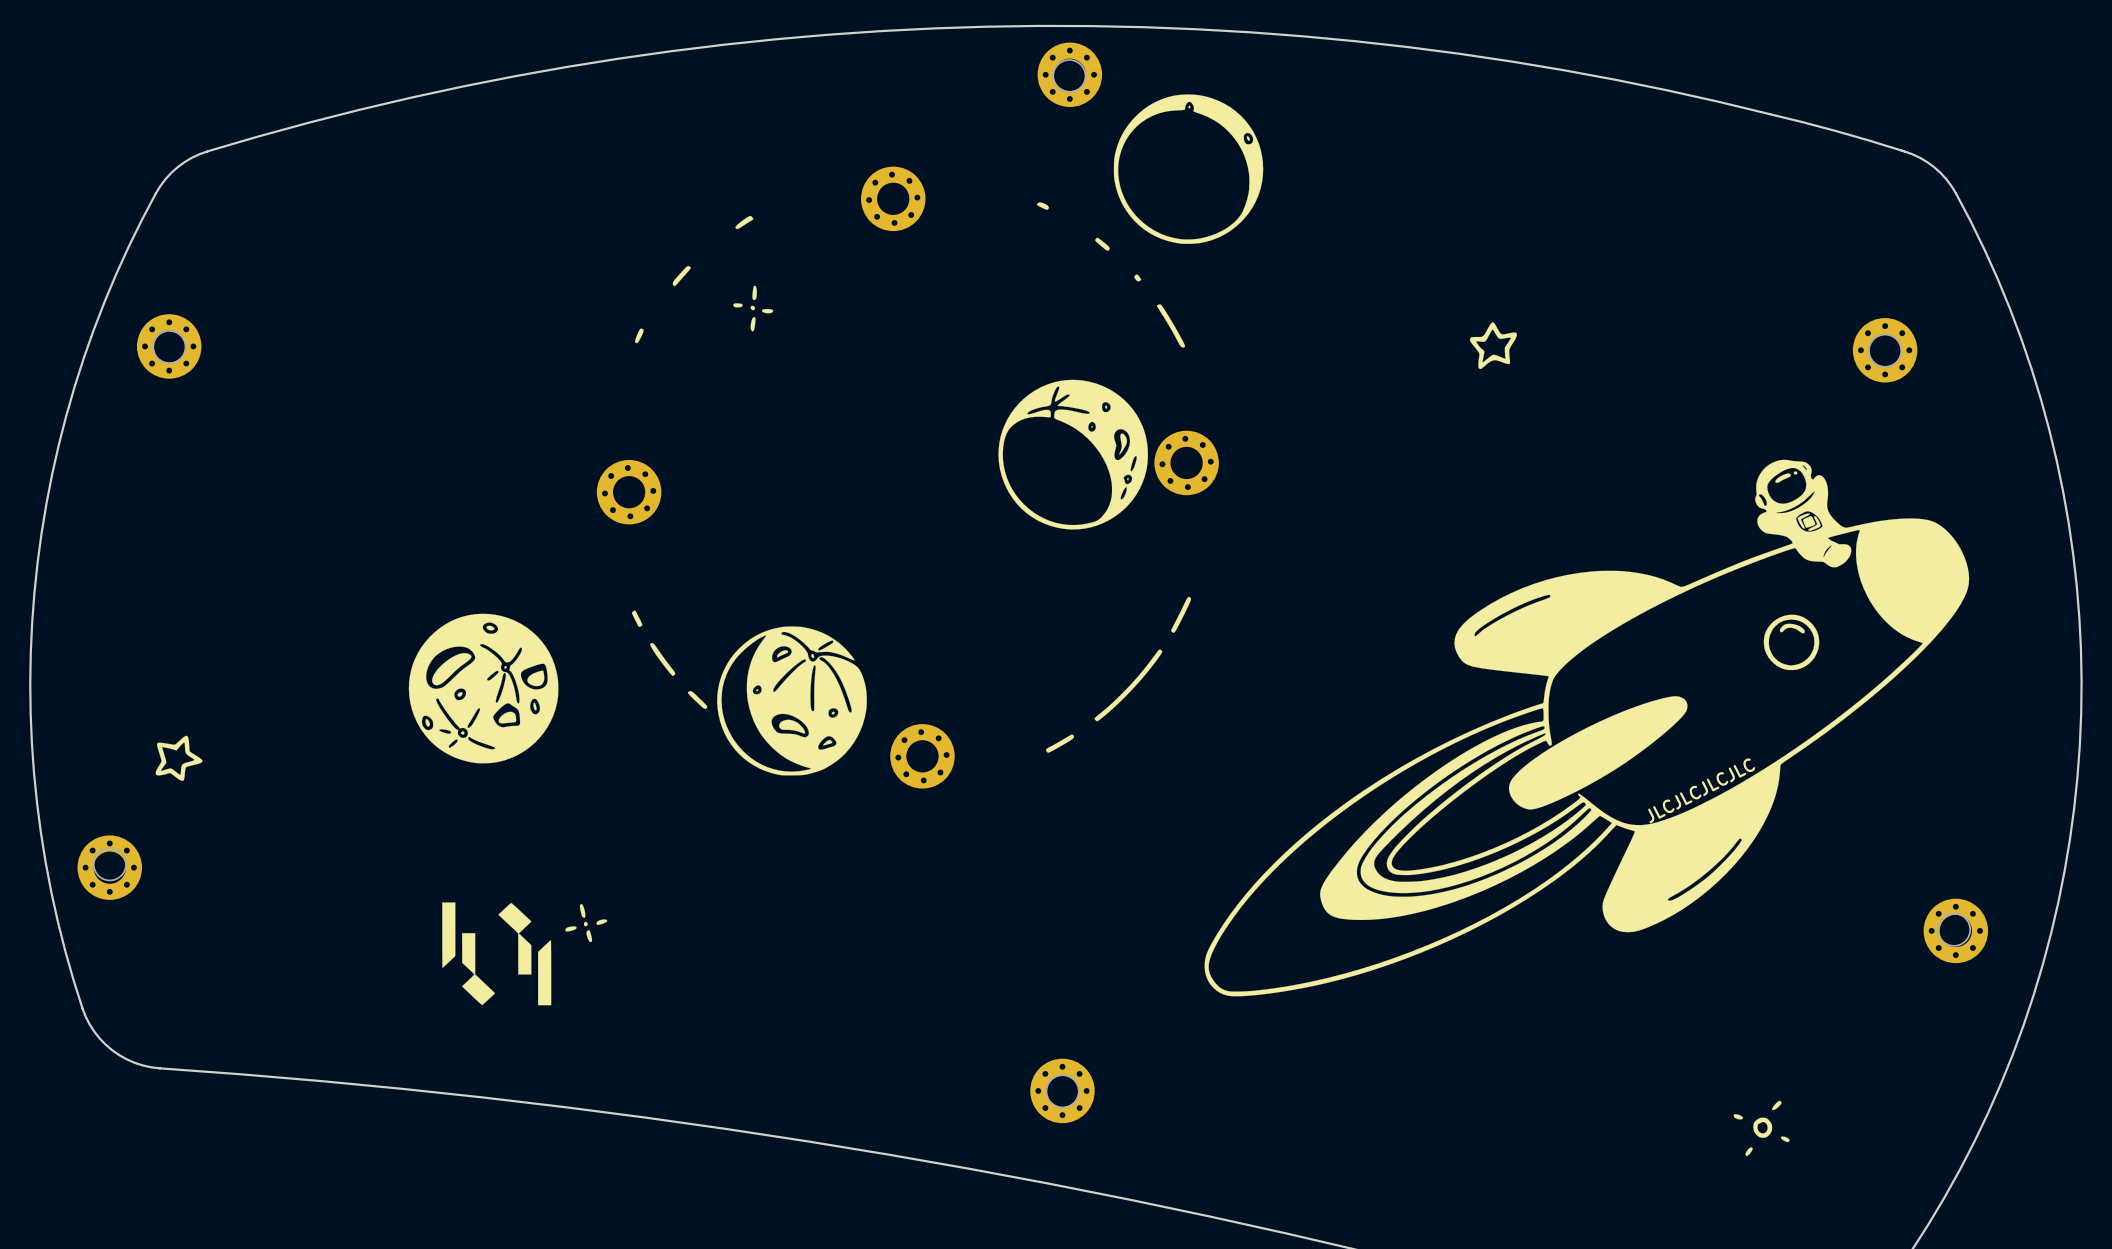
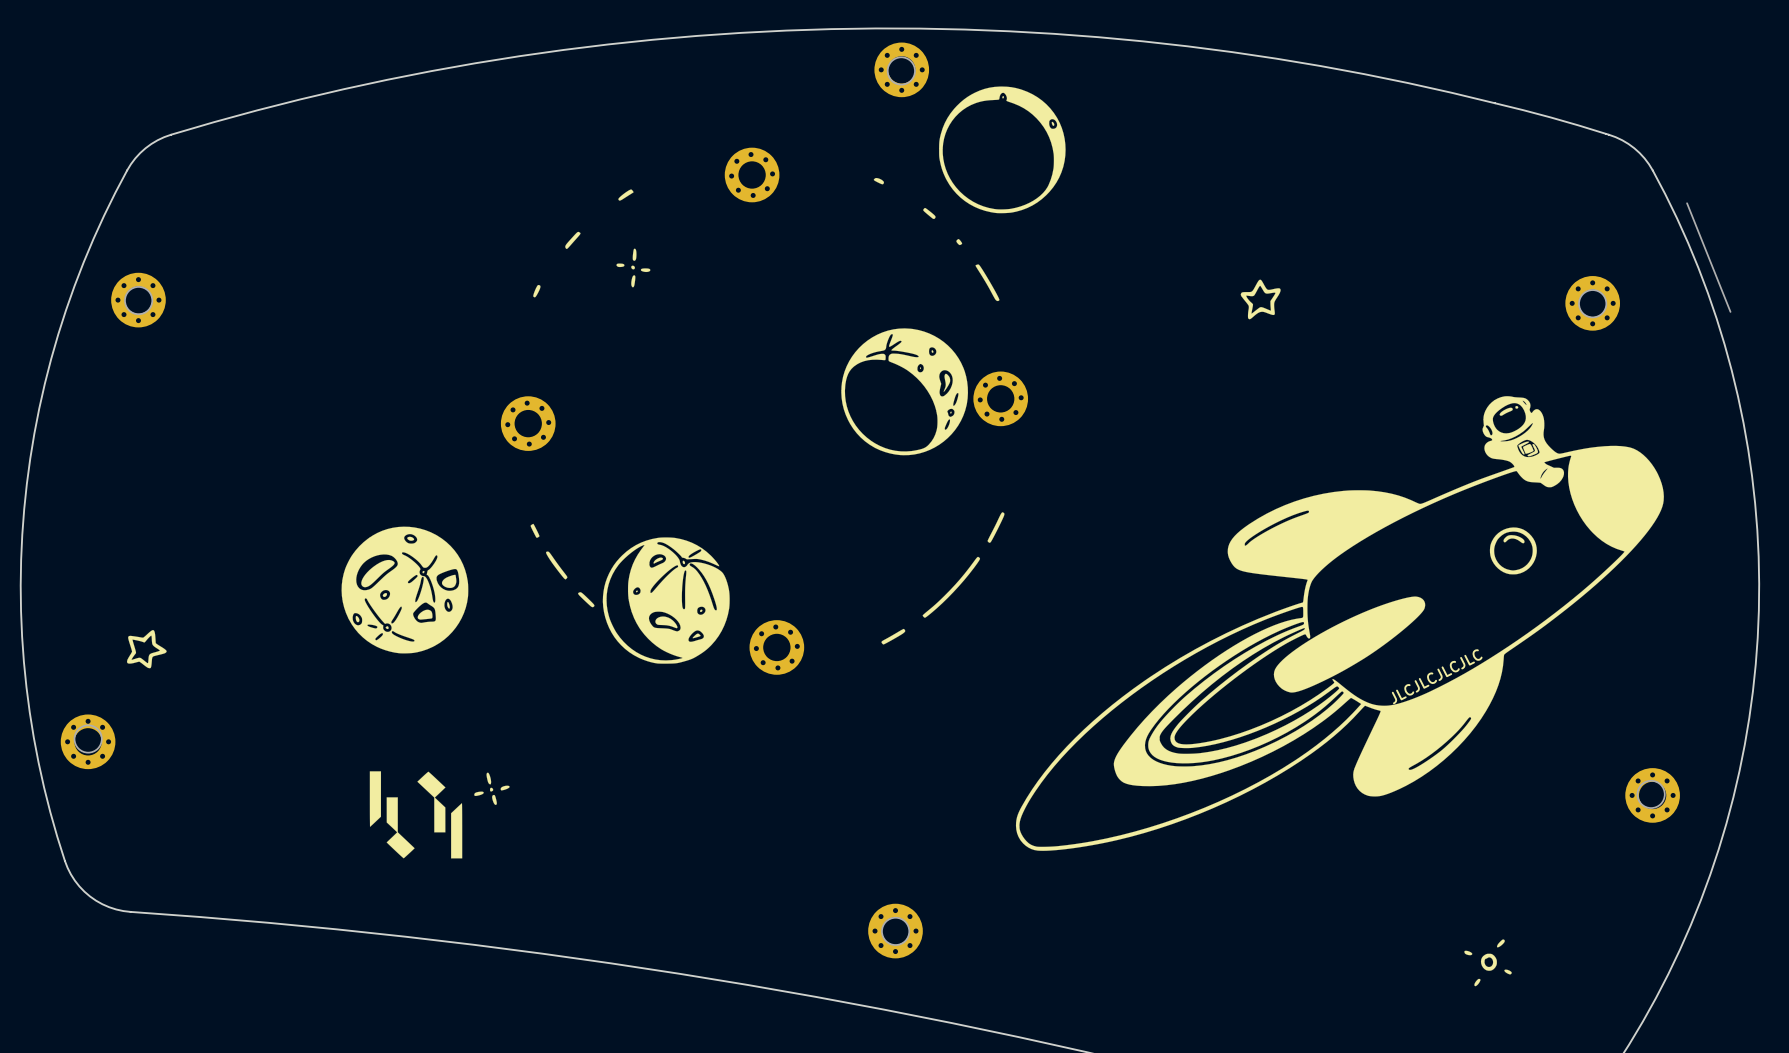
line: none -> (1687, 203) (1730, 311)

